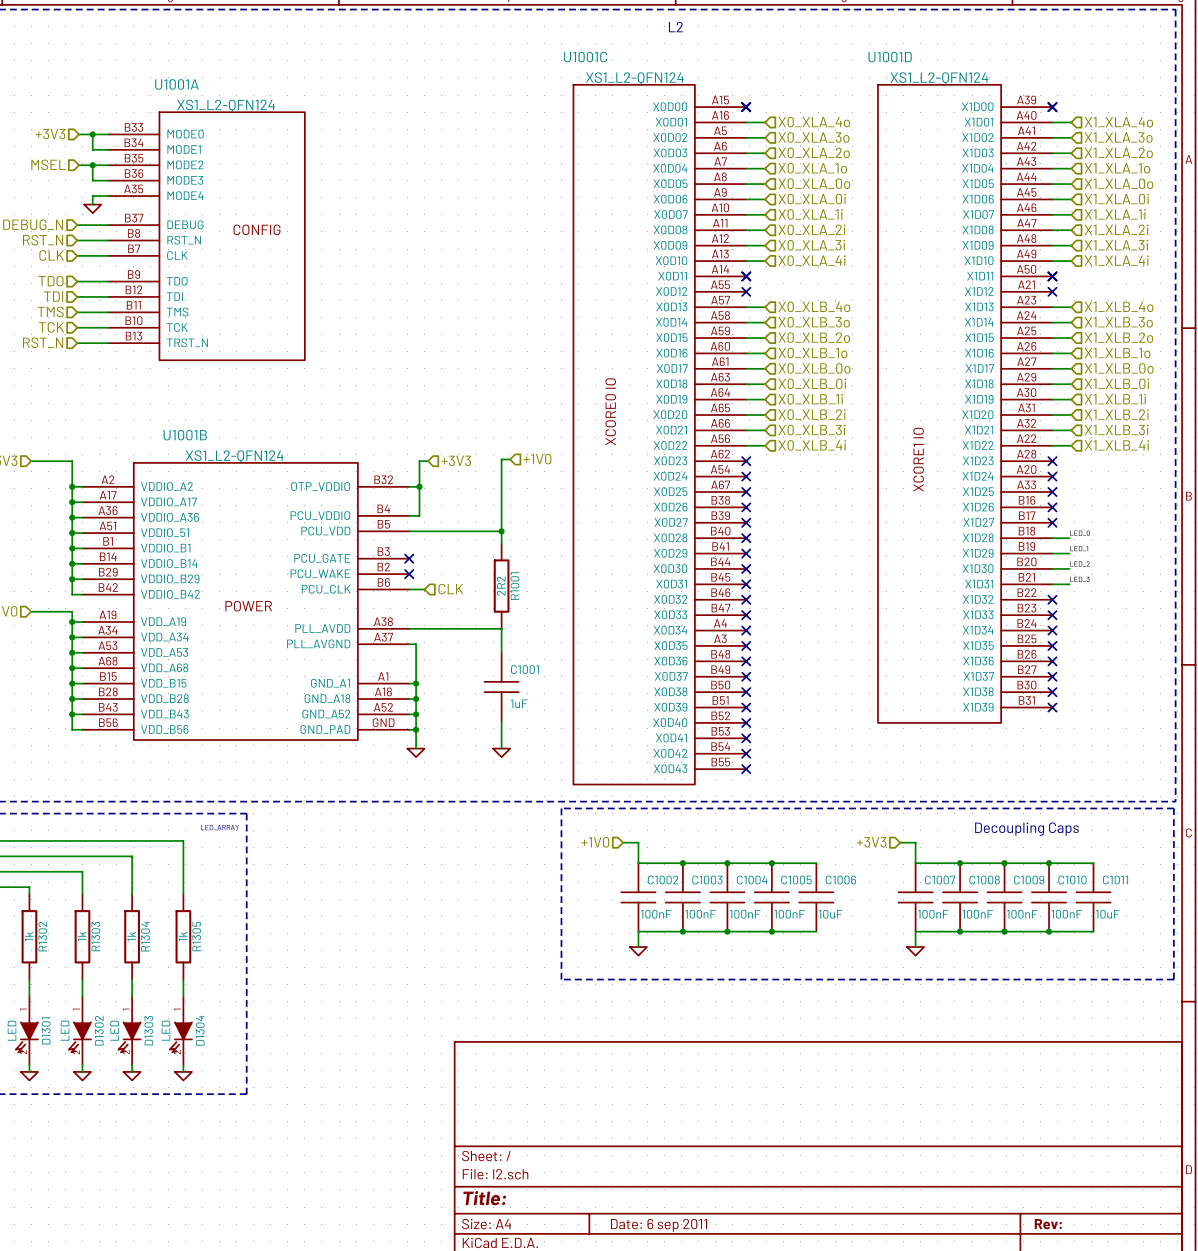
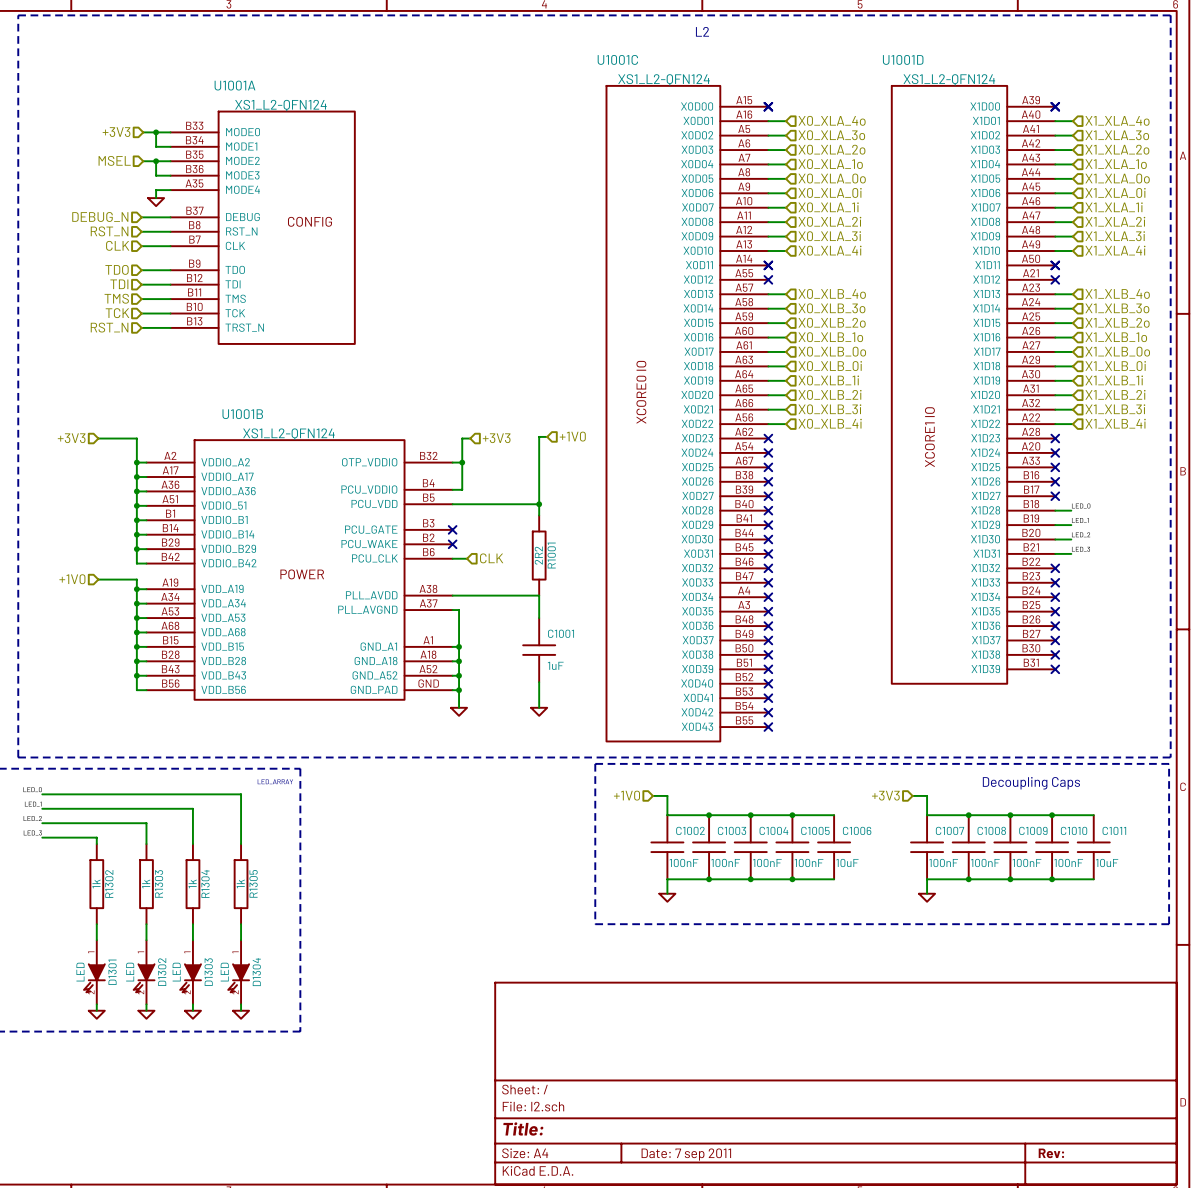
title block: Date: 6 sep 2011 (658, 1225) -> Date: 7 sep 2011 (686, 1154)

